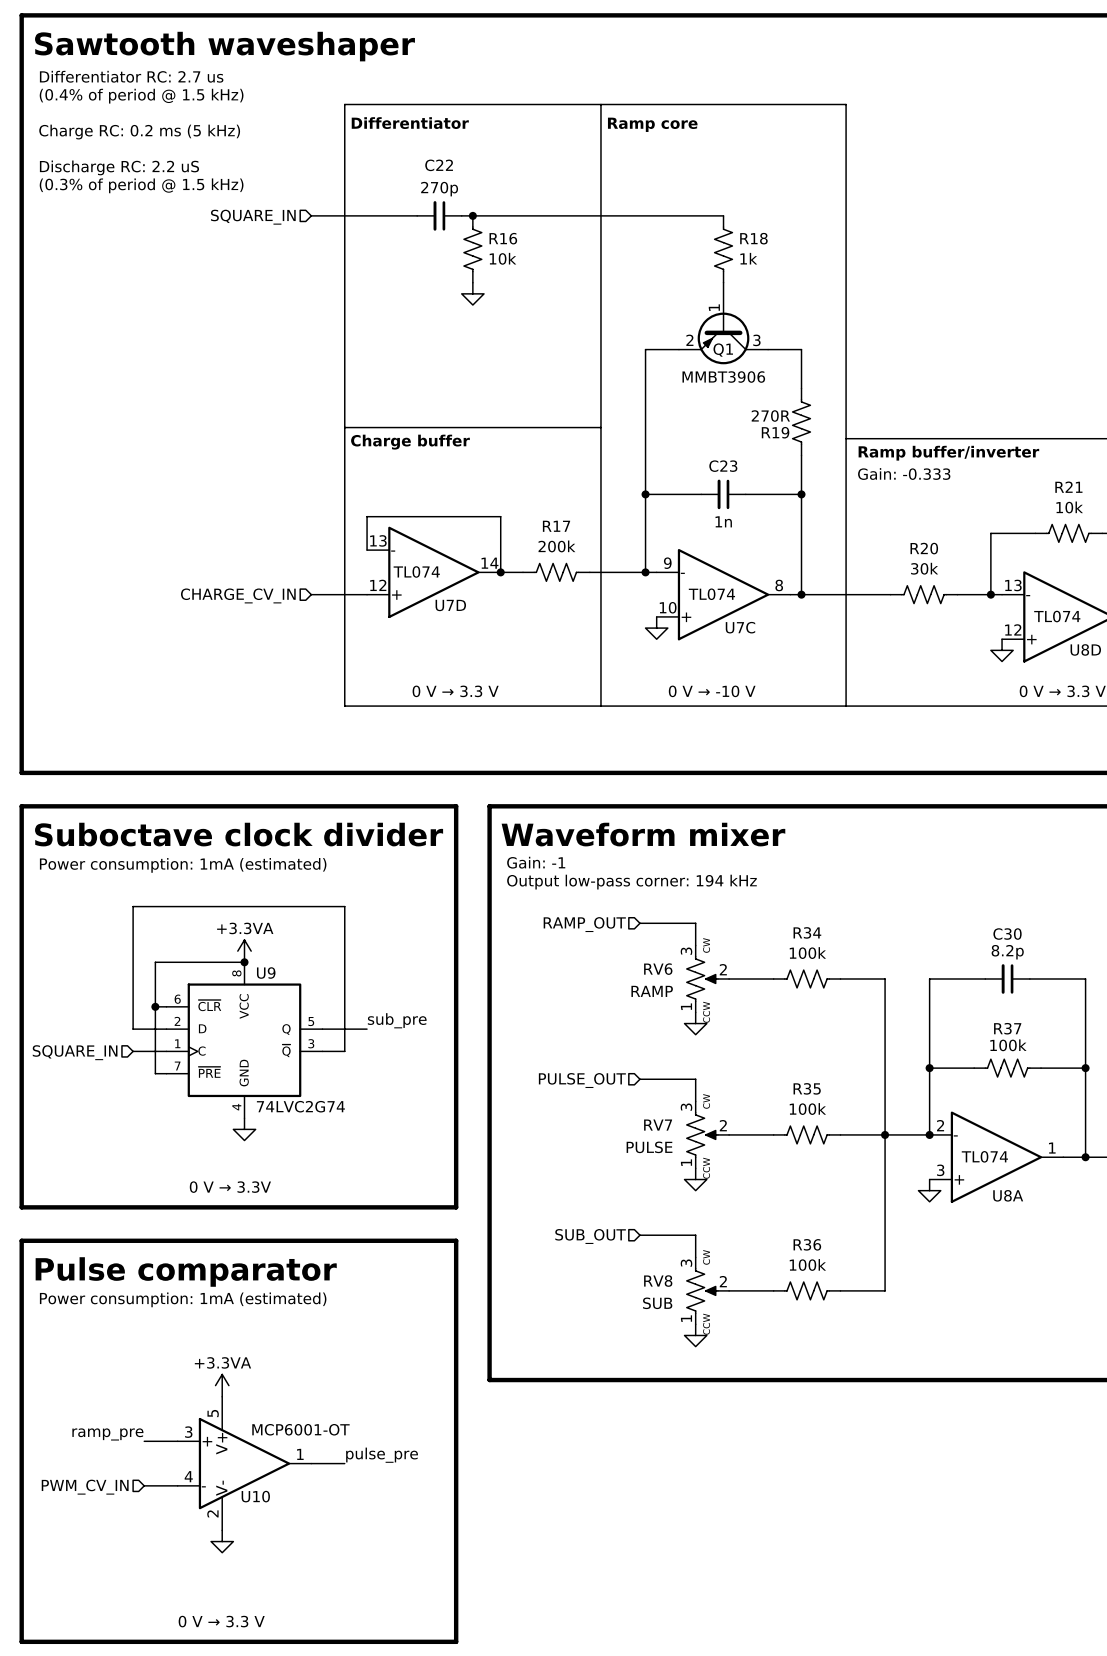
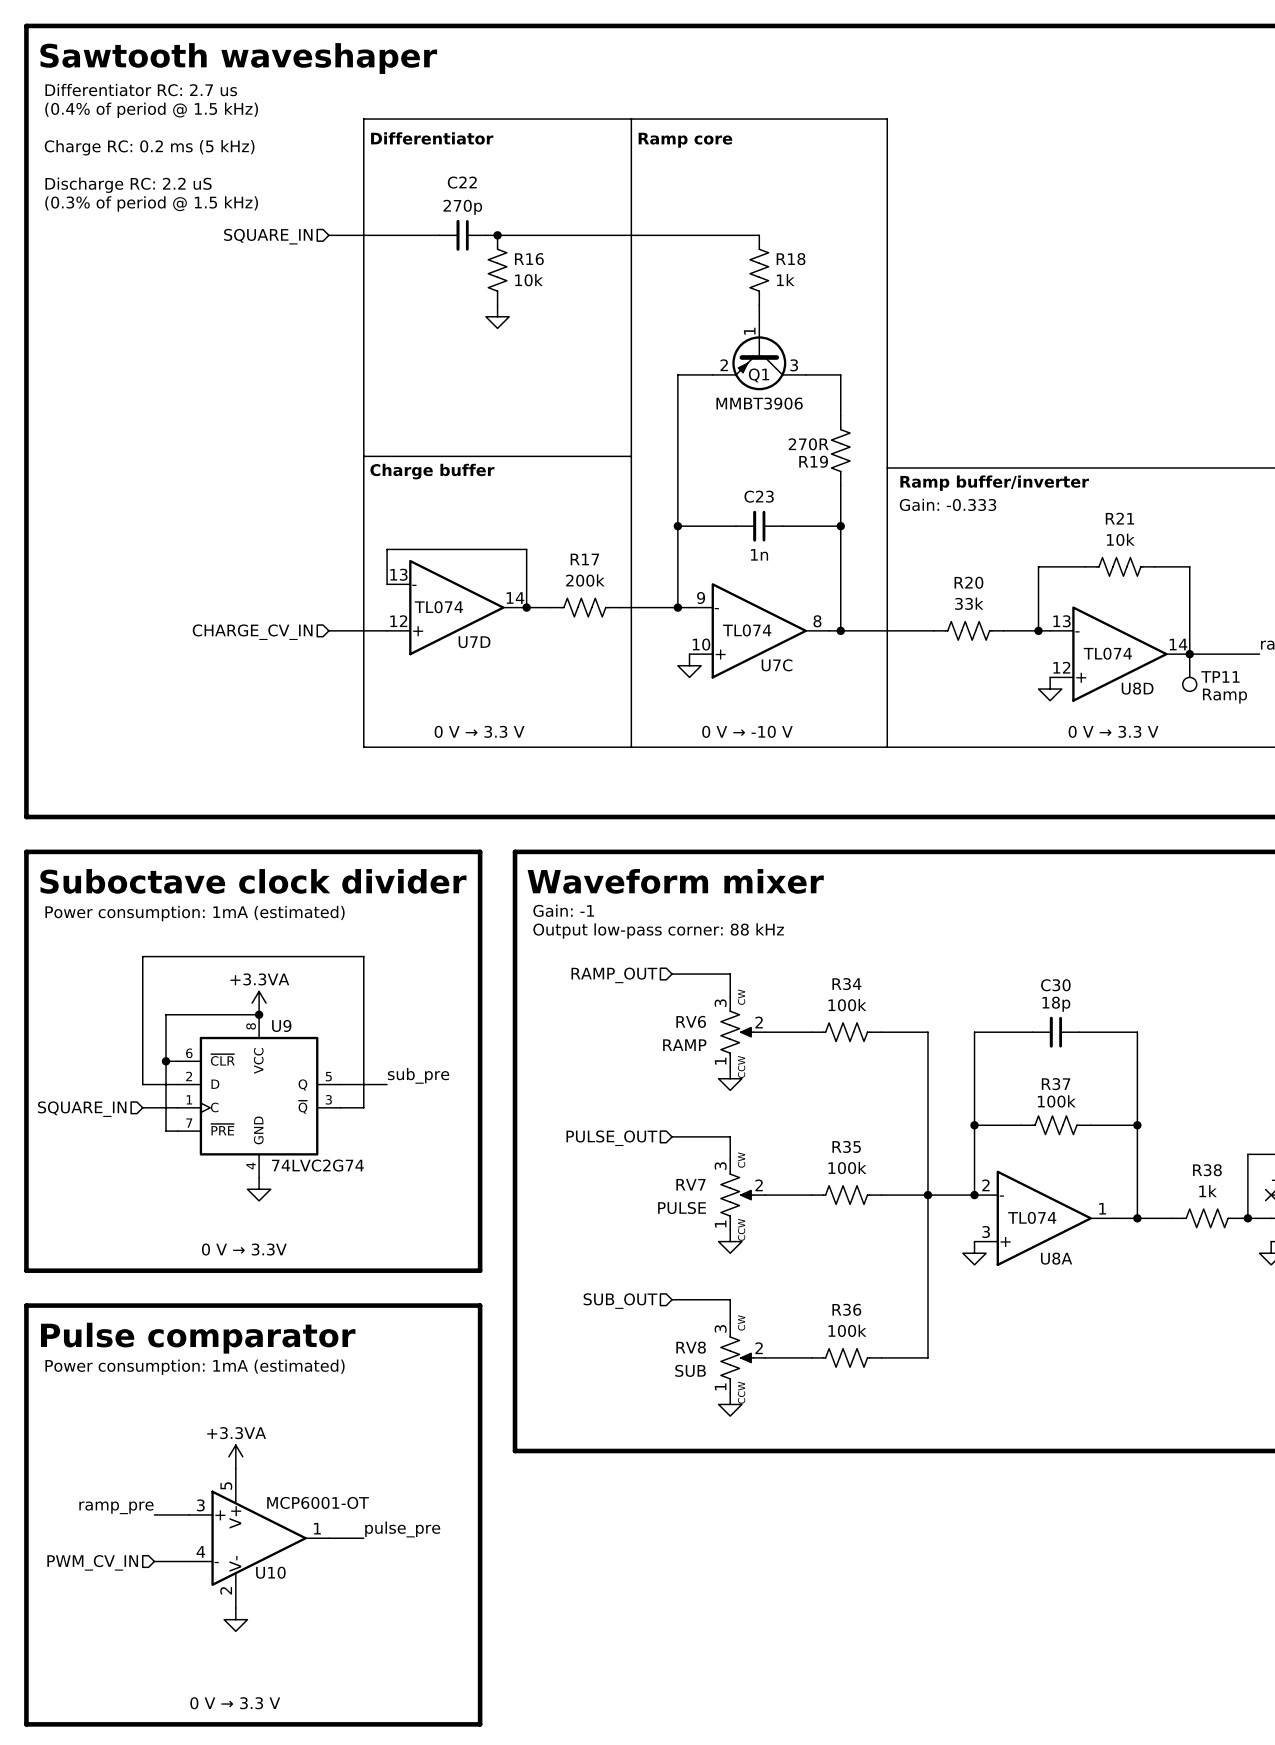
R20 value: 30k (924, 568) -> 33k (969, 603)
text: Output low-pass corner: 194 kHz (631, 882) -> Output low-pass corner: 88 kHz (658, 931)
C30 value: 8.2p (1007, 952) -> 18p (1056, 1004)

